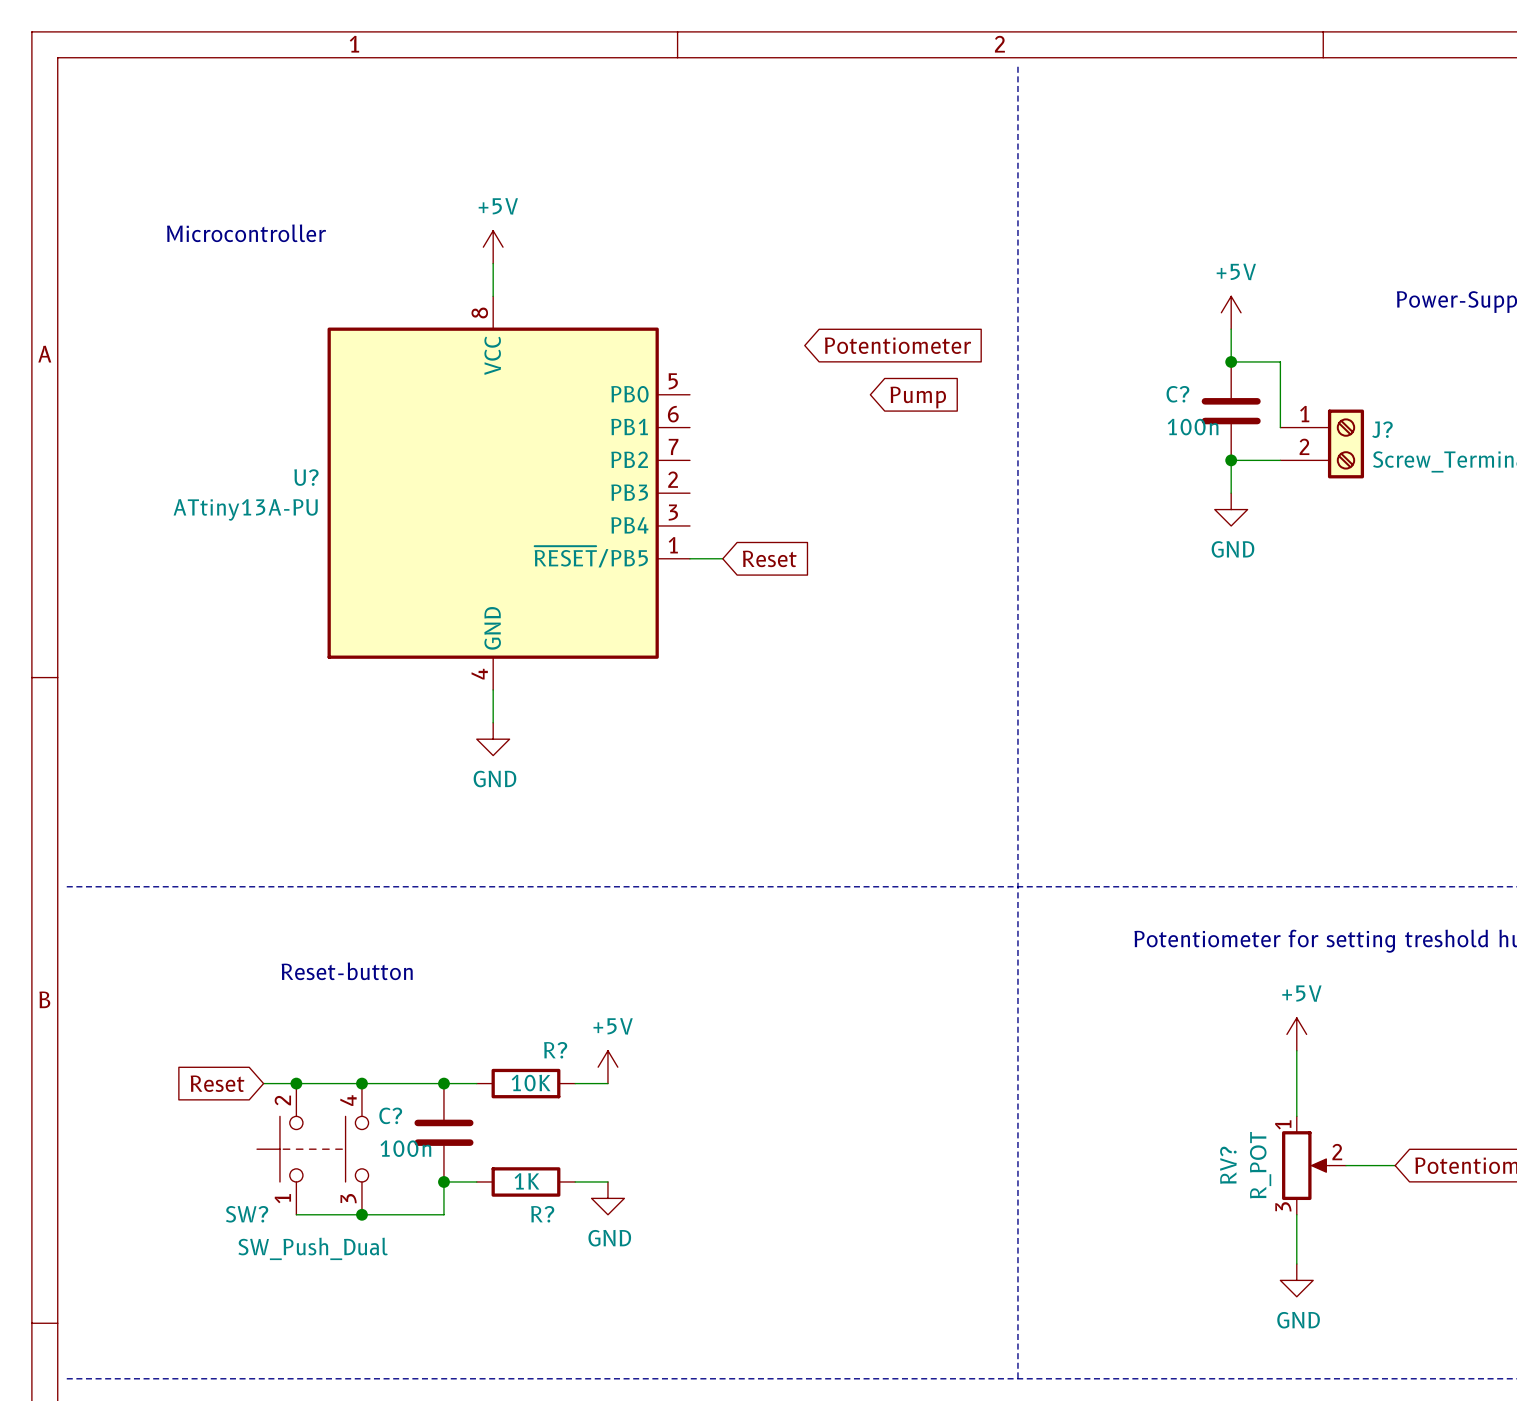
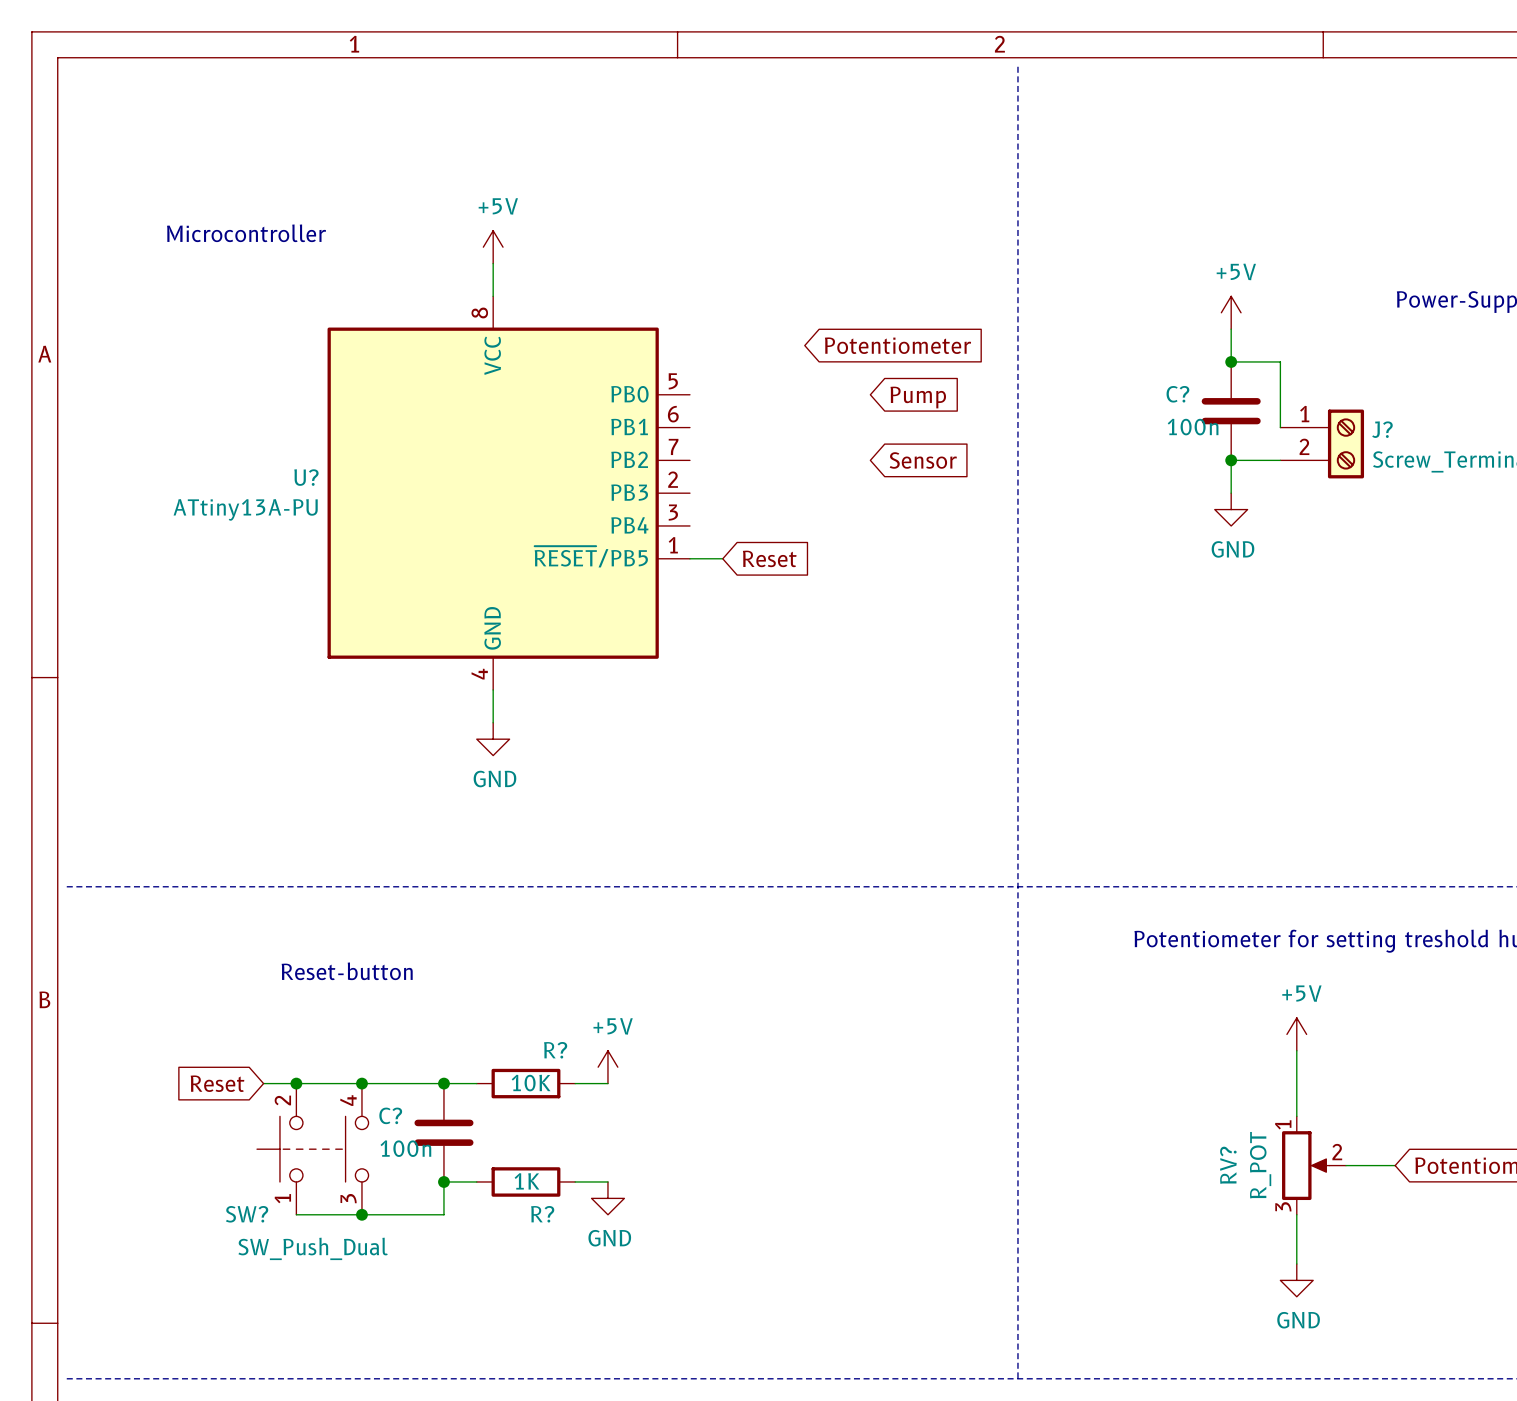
global label: none -> Sensor (923, 460)

